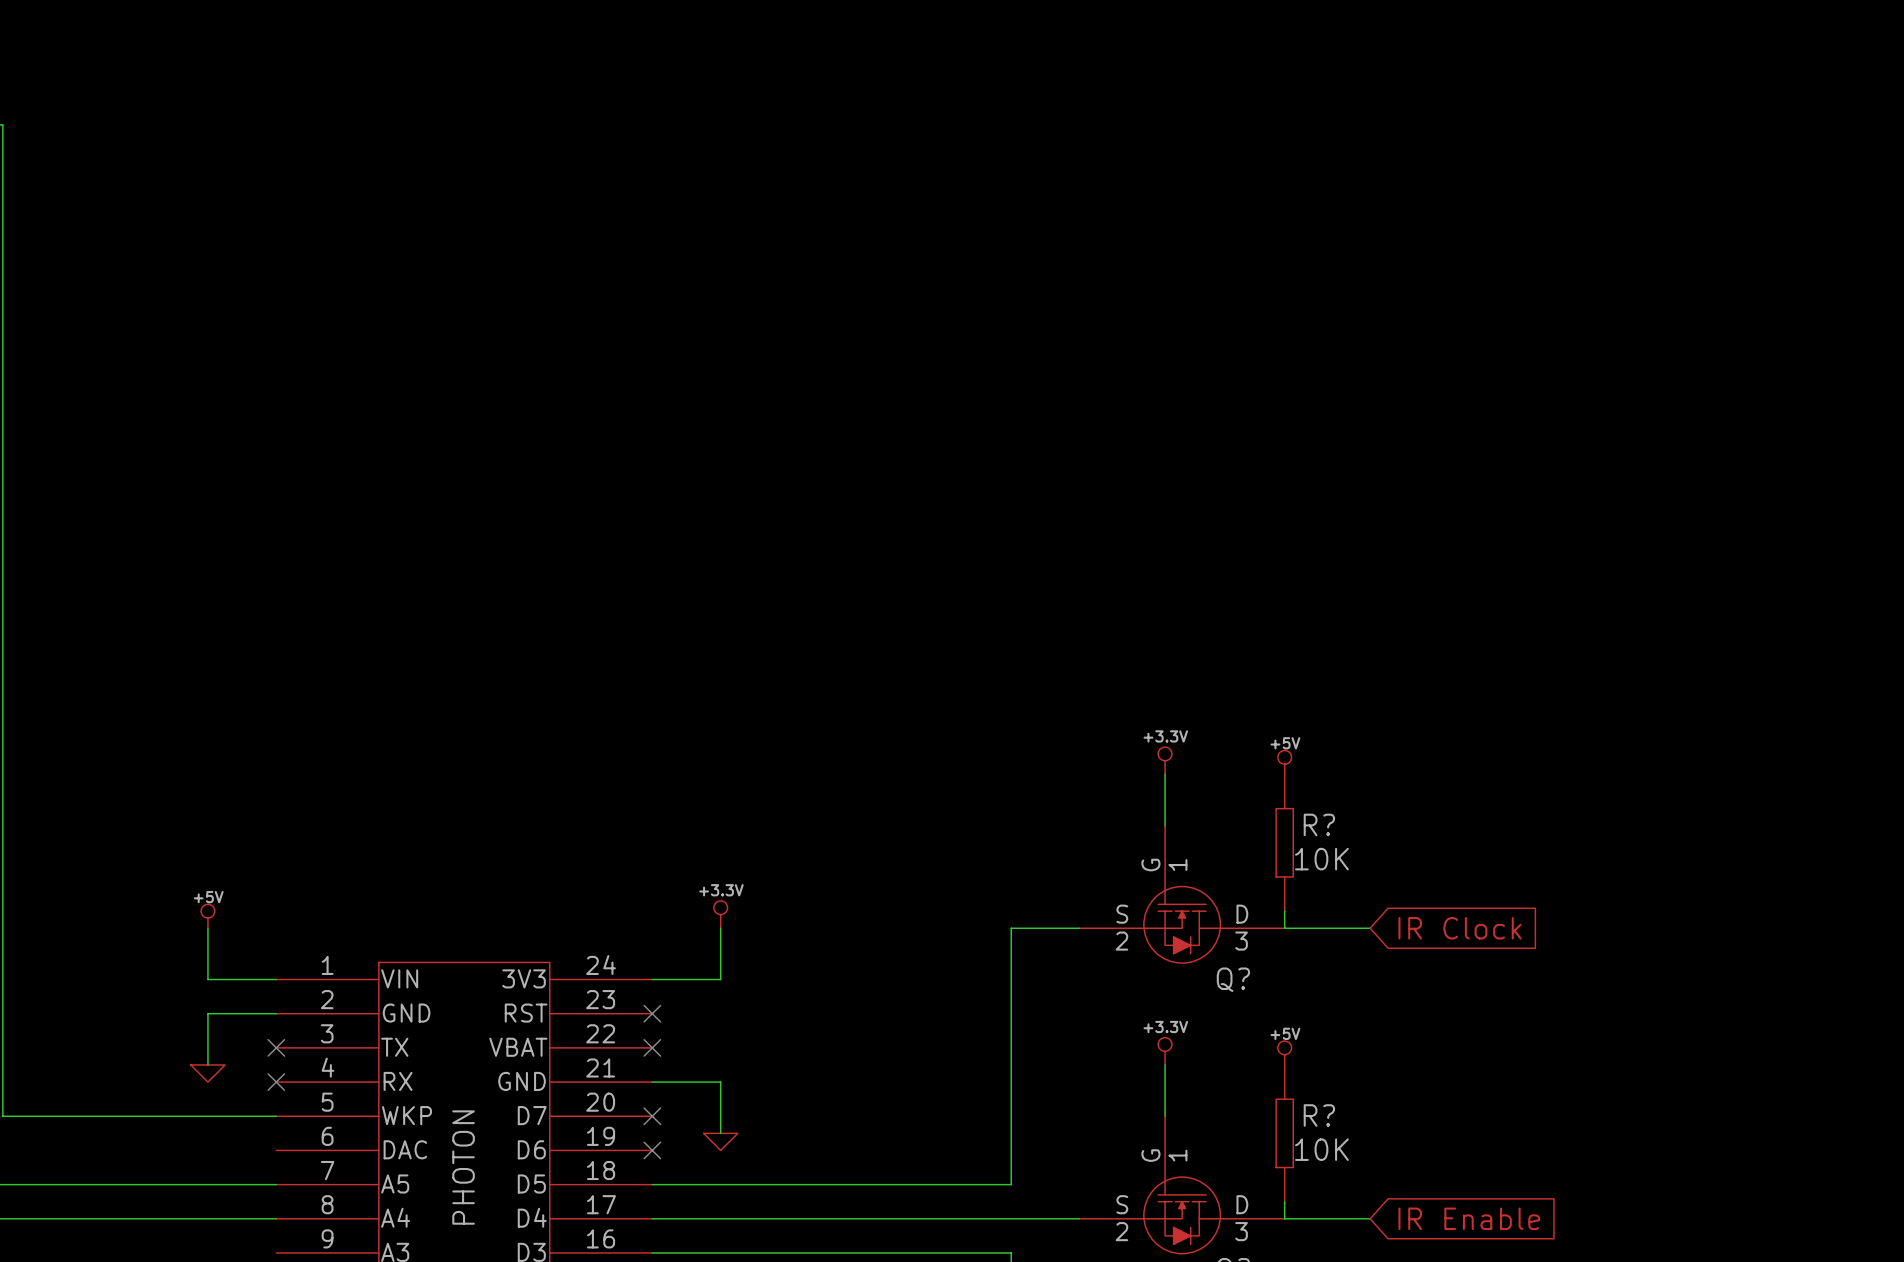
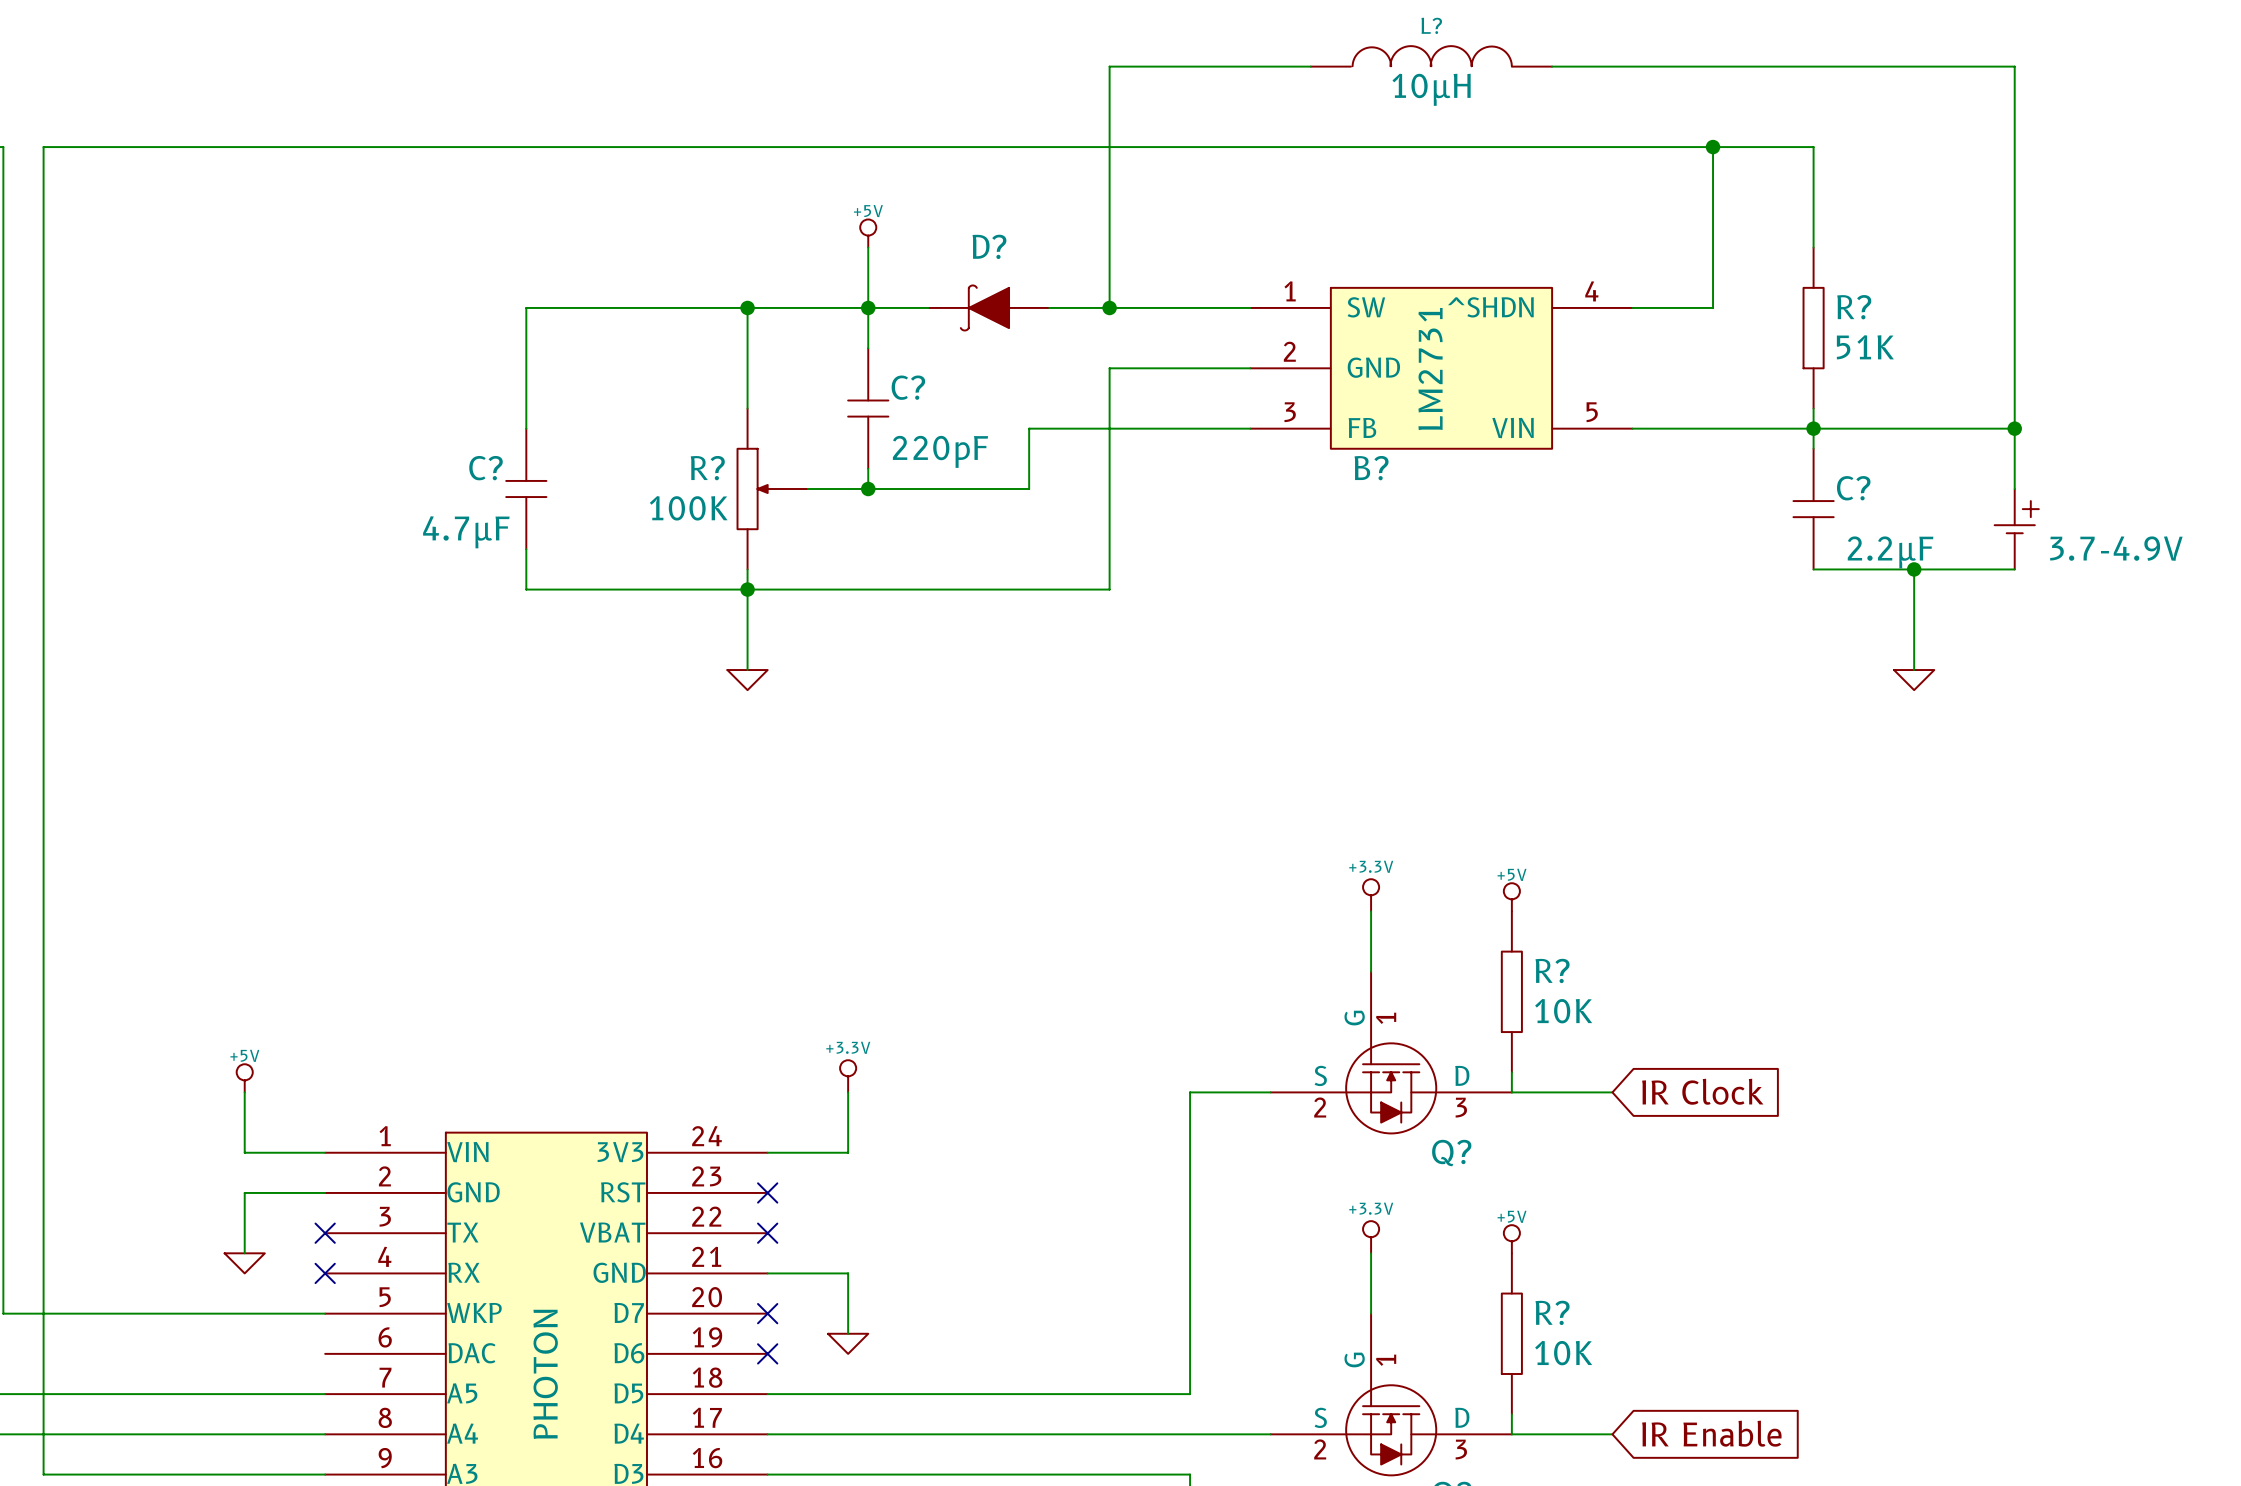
L?: none -> (1431, 56)
wire: none -> (1310, 66) (1109, 66) (1109, 307)
wire: none -> (1552, 66) (2014, 66) (2014, 489)
wire: none -> (1713, 147) (1713, 307) (1632, 307)
junction: none -> (1713, 147)
power symbol: none -> +5V (868, 233)
wire: none -> (868, 247) (868, 348)
wire: none -> (1813, 247) (1813, 147) (43, 147) (43, 1474) (325, 1474)
wire: none -> (747, 307) (747, 408)
junction: none -> (747, 307)
junction: none -> (868, 307)
wire: none -> (928, 307) (526, 307) (526, 428)
D?: none -> (988, 307)
wire: none -> (1049, 307) (1250, 307)
junction: none -> (1109, 307)
R?: none -> (1813, 328)
wire: none -> (1250, 368) (1109, 368) (1109, 589) (526, 589) (526, 549)
B?: none -> LM2731 (1441, 368)
C?: none -> (868, 408)
wire: none -> (1813, 408) (1813, 448)
wire: none -> (1250, 428) (1029, 428) (1029, 489) (807, 489)
wire: none -> (1632, 428) (2014, 428)
junction: none -> (1813, 428)
junction: none -> (2014, 428)
wire: none -> (868, 468) (868, 489)
C?: none -> (526, 489)
R?: none -> (772, 489)
junction: none -> (868, 489)
C?: none -> (1813, 509)
part: none -> (2016, 529)
wire: none -> (747, 569) (747, 670)
wire: none -> (1813, 569) (2014, 569)
wire: none -> (1914, 569) (1914, 670)
junction: none -> (1914, 569)
junction: none -> (747, 589)
power symbol: none -> (747, 680)
power symbol: none -> (1914, 680)

